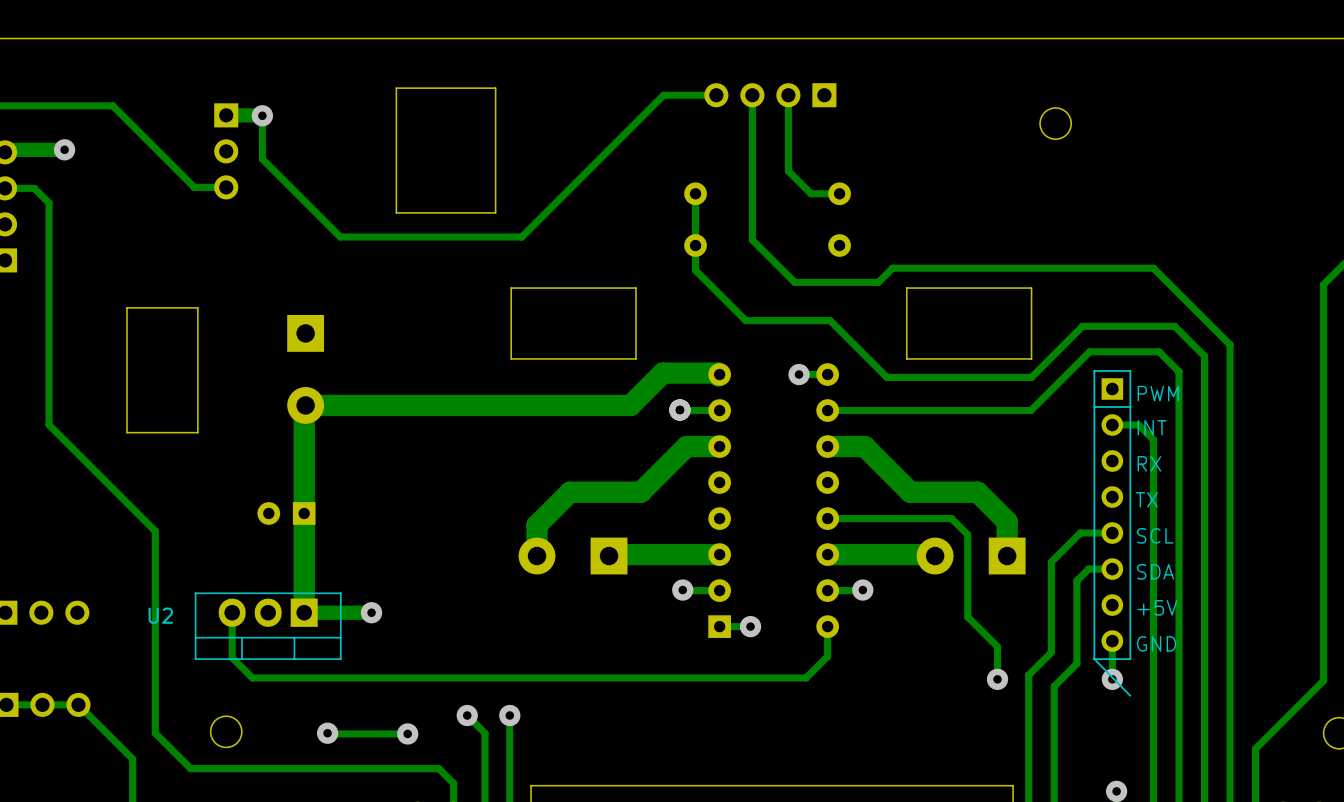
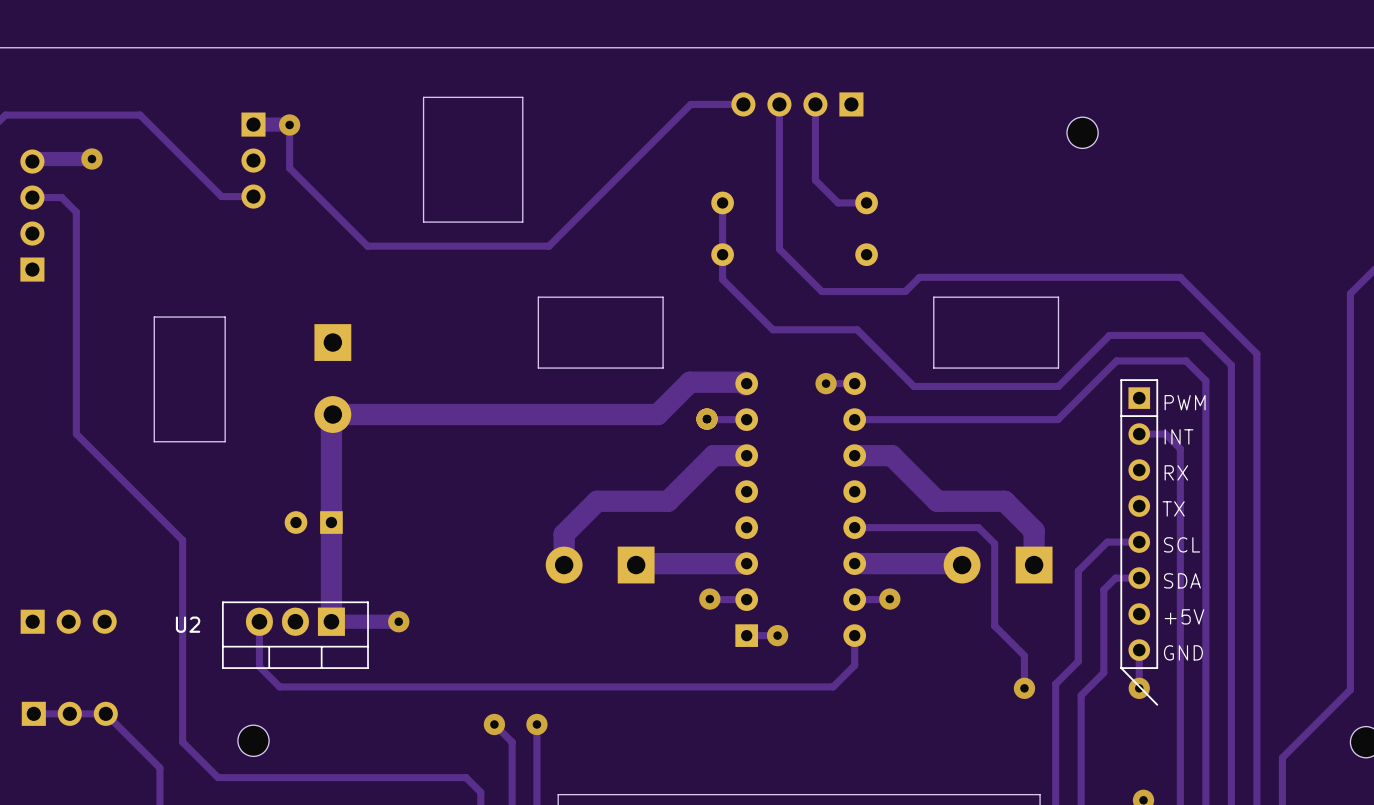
track: (327, 733) (407, 733) -> none
via: (327, 733) -> none
via: (407, 733) -> none

